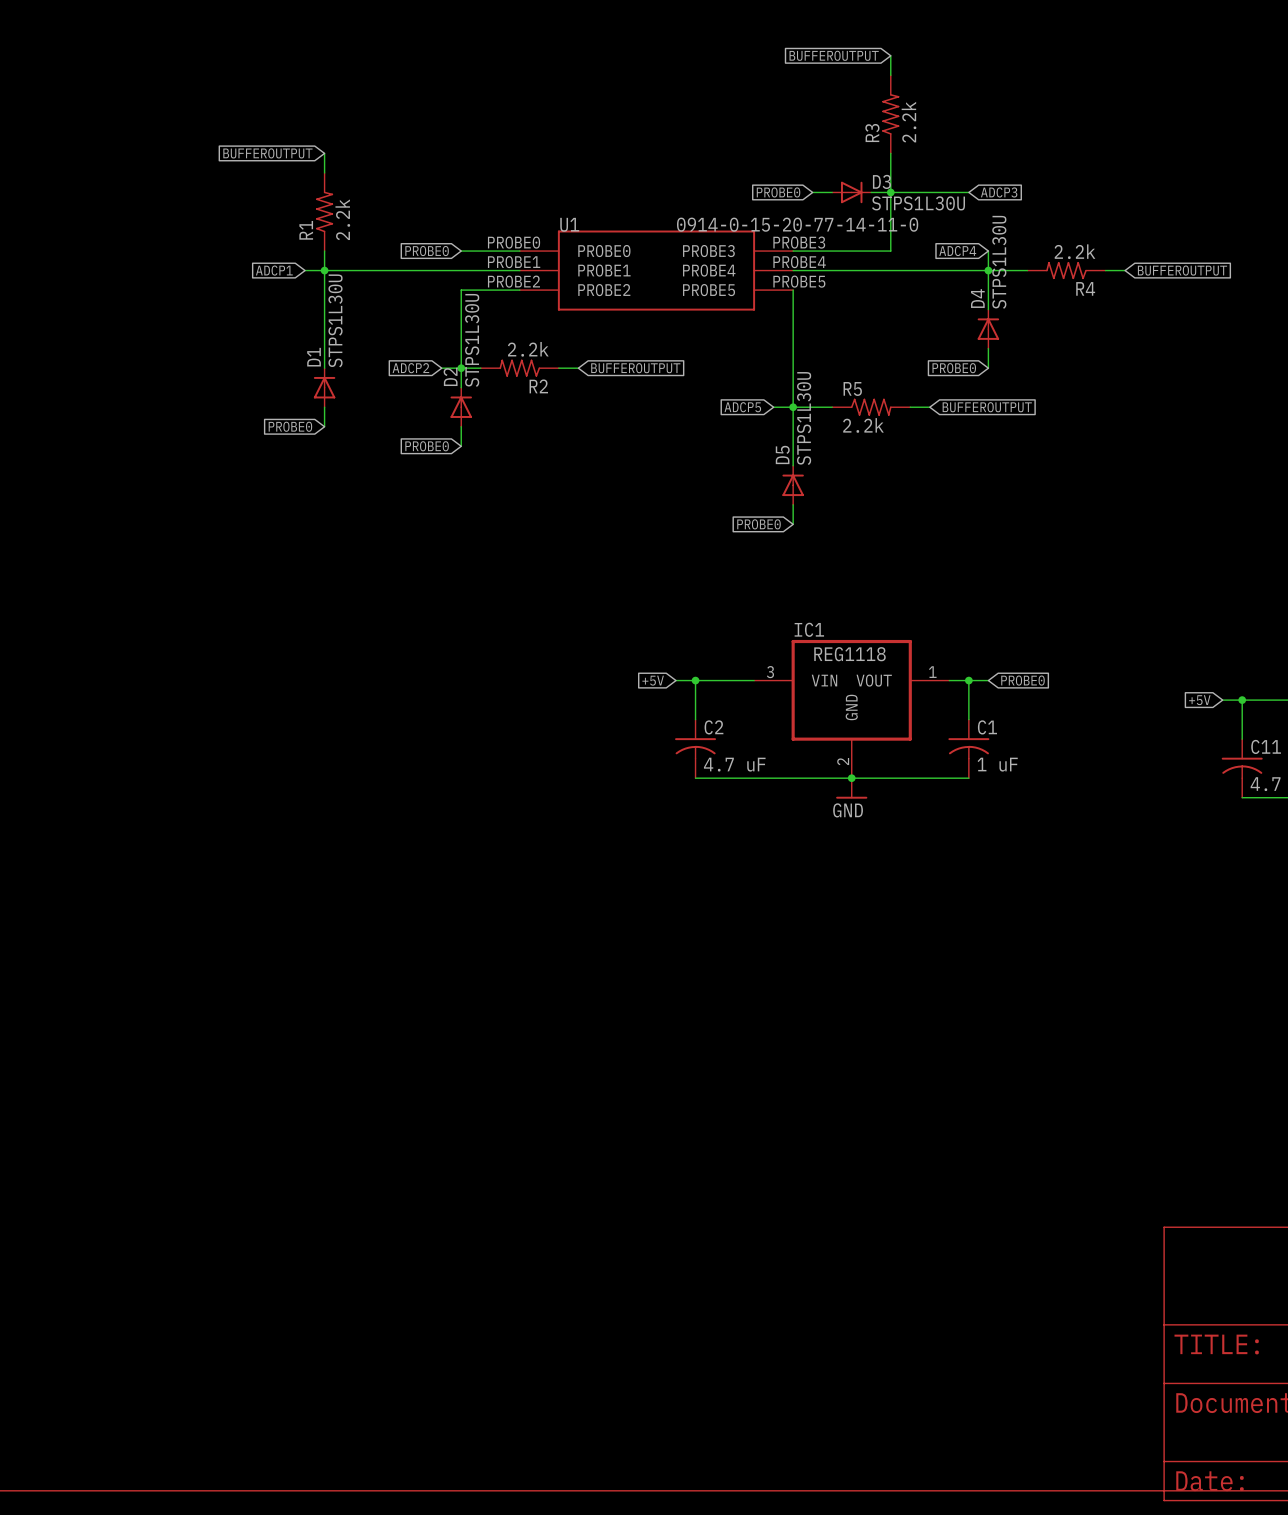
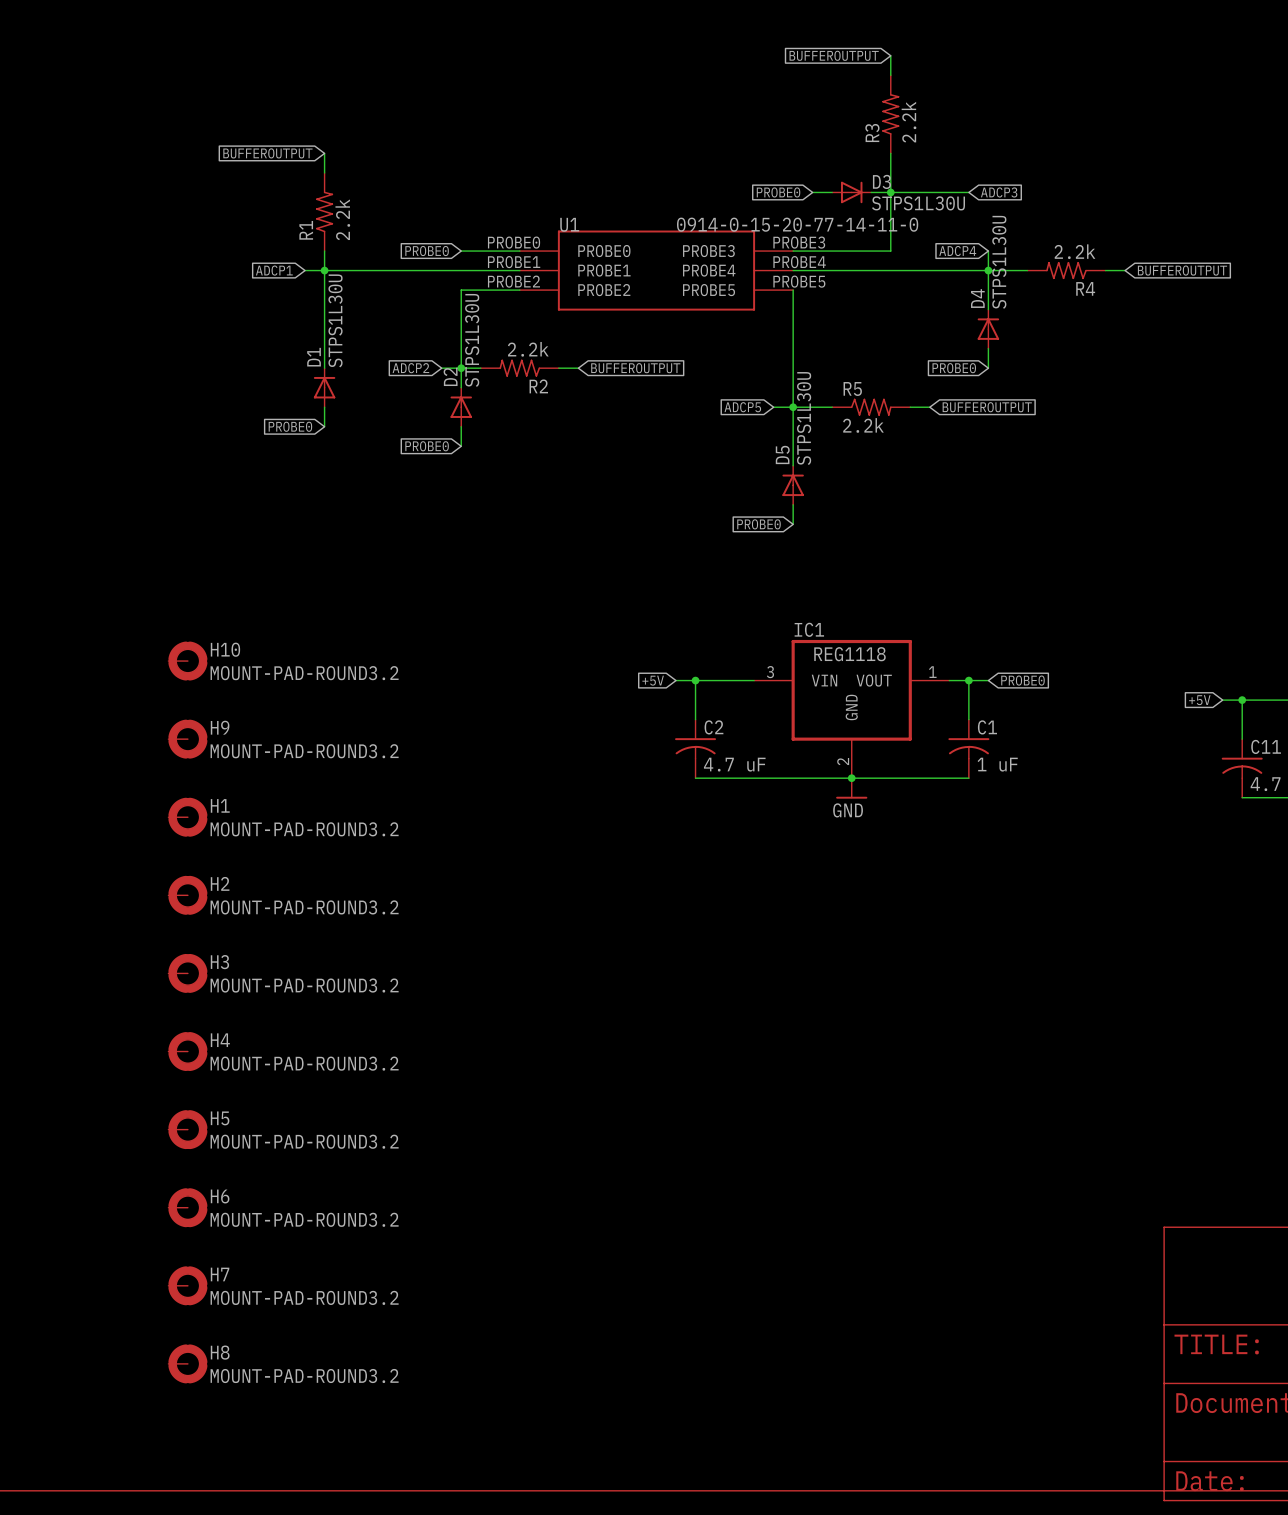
H10: none -> MOUNT-PAD-ROUND3.2 (187, 661)
H9: none -> MOUNT-PAD-ROUND3.2 (187, 739)
H1: none -> MOUNT-PAD-ROUND3.2 (187, 817)
H2: none -> MOUNT-PAD-ROUND3.2 (187, 895)
H3: none -> MOUNT-PAD-ROUND3.2 (187, 973)
H4: none -> MOUNT-PAD-ROUND3.2 (187, 1051)
H5: none -> MOUNT-PAD-ROUND3.2 (187, 1129)
H6: none -> MOUNT-PAD-ROUND3.2 (187, 1207)
H7: none -> MOUNT-PAD-ROUND3.2 (187, 1285)
H8: none -> MOUNT-PAD-ROUND3.2 (187, 1363)

